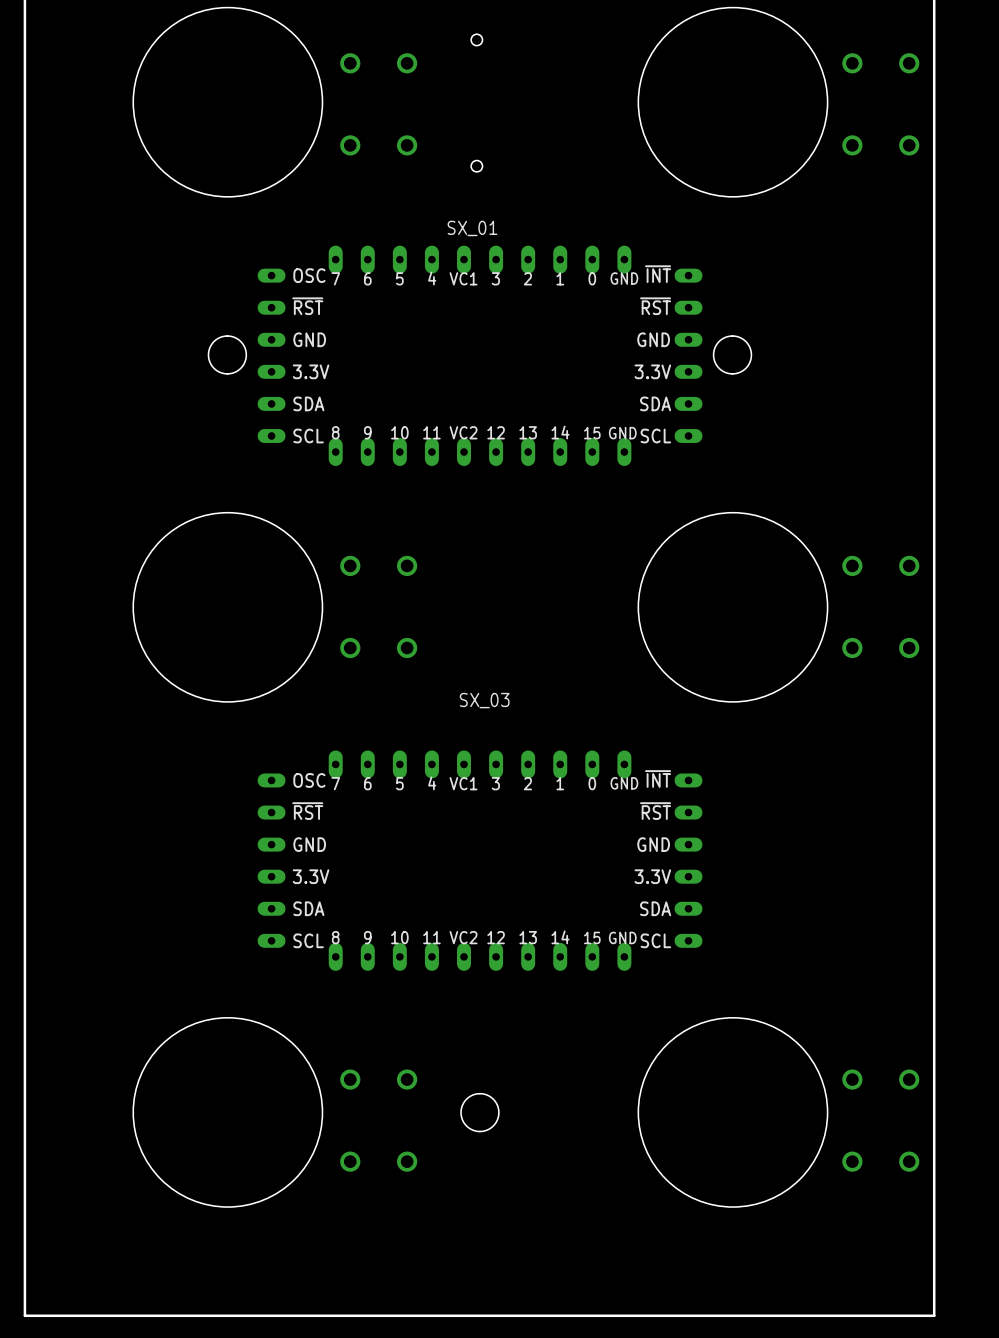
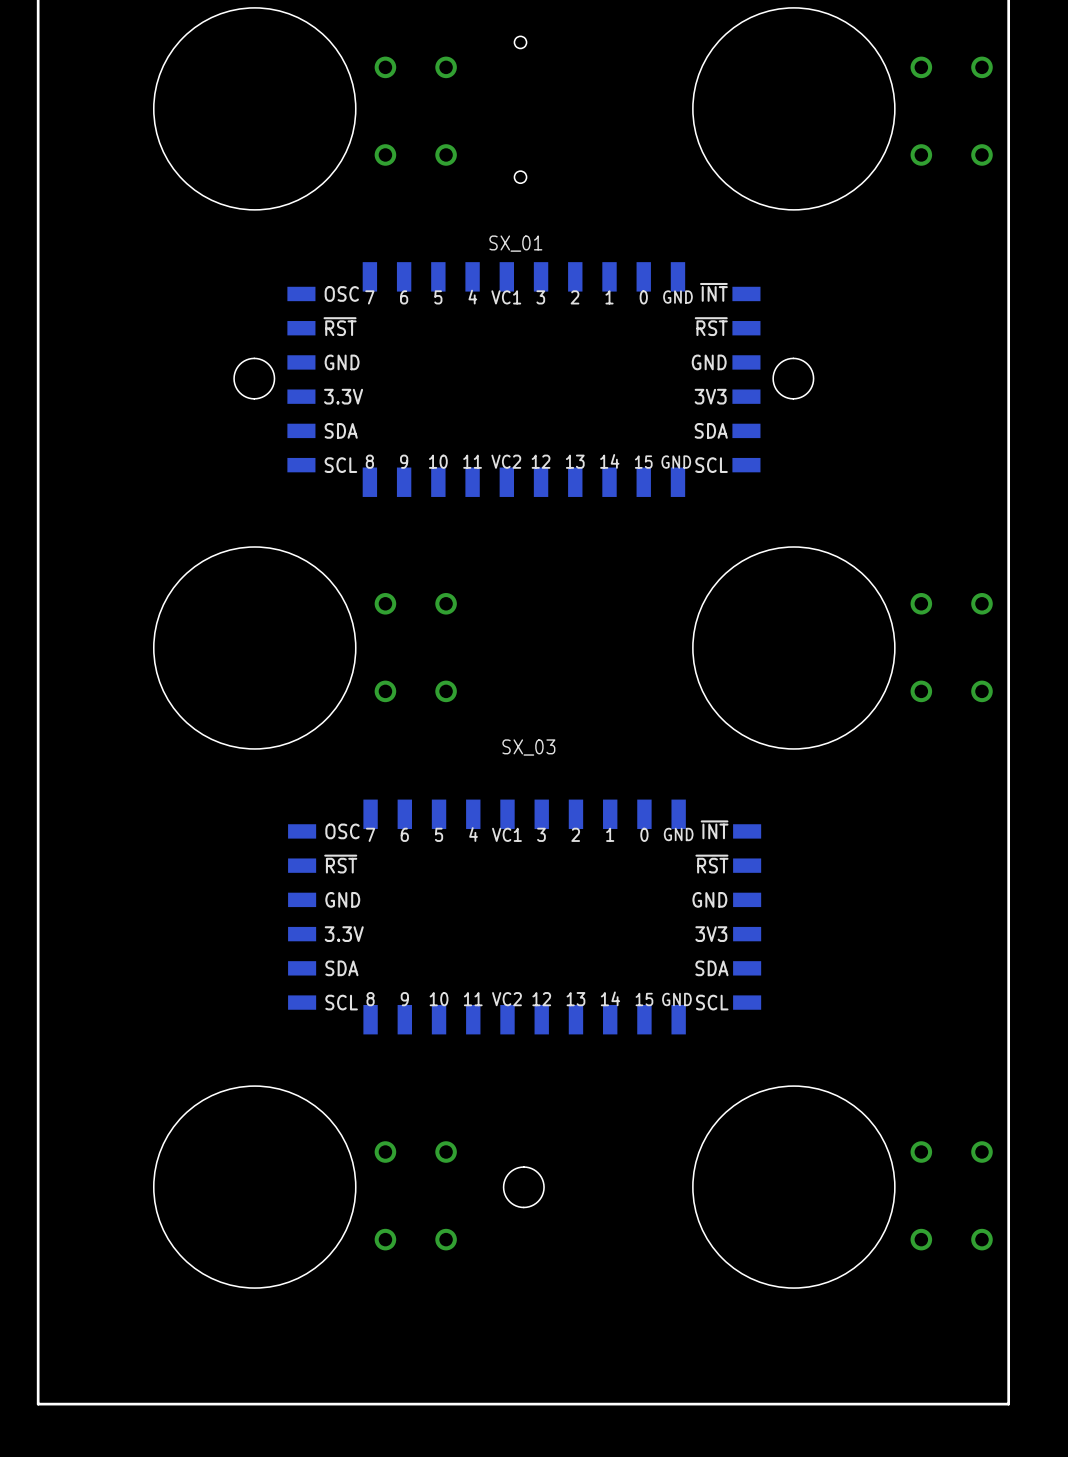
part footprint: [257, 245, 703, 467] -> [287, 262, 761, 497]
part footprint: [257, 750, 703, 971] -> [288, 799, 762, 1035]

